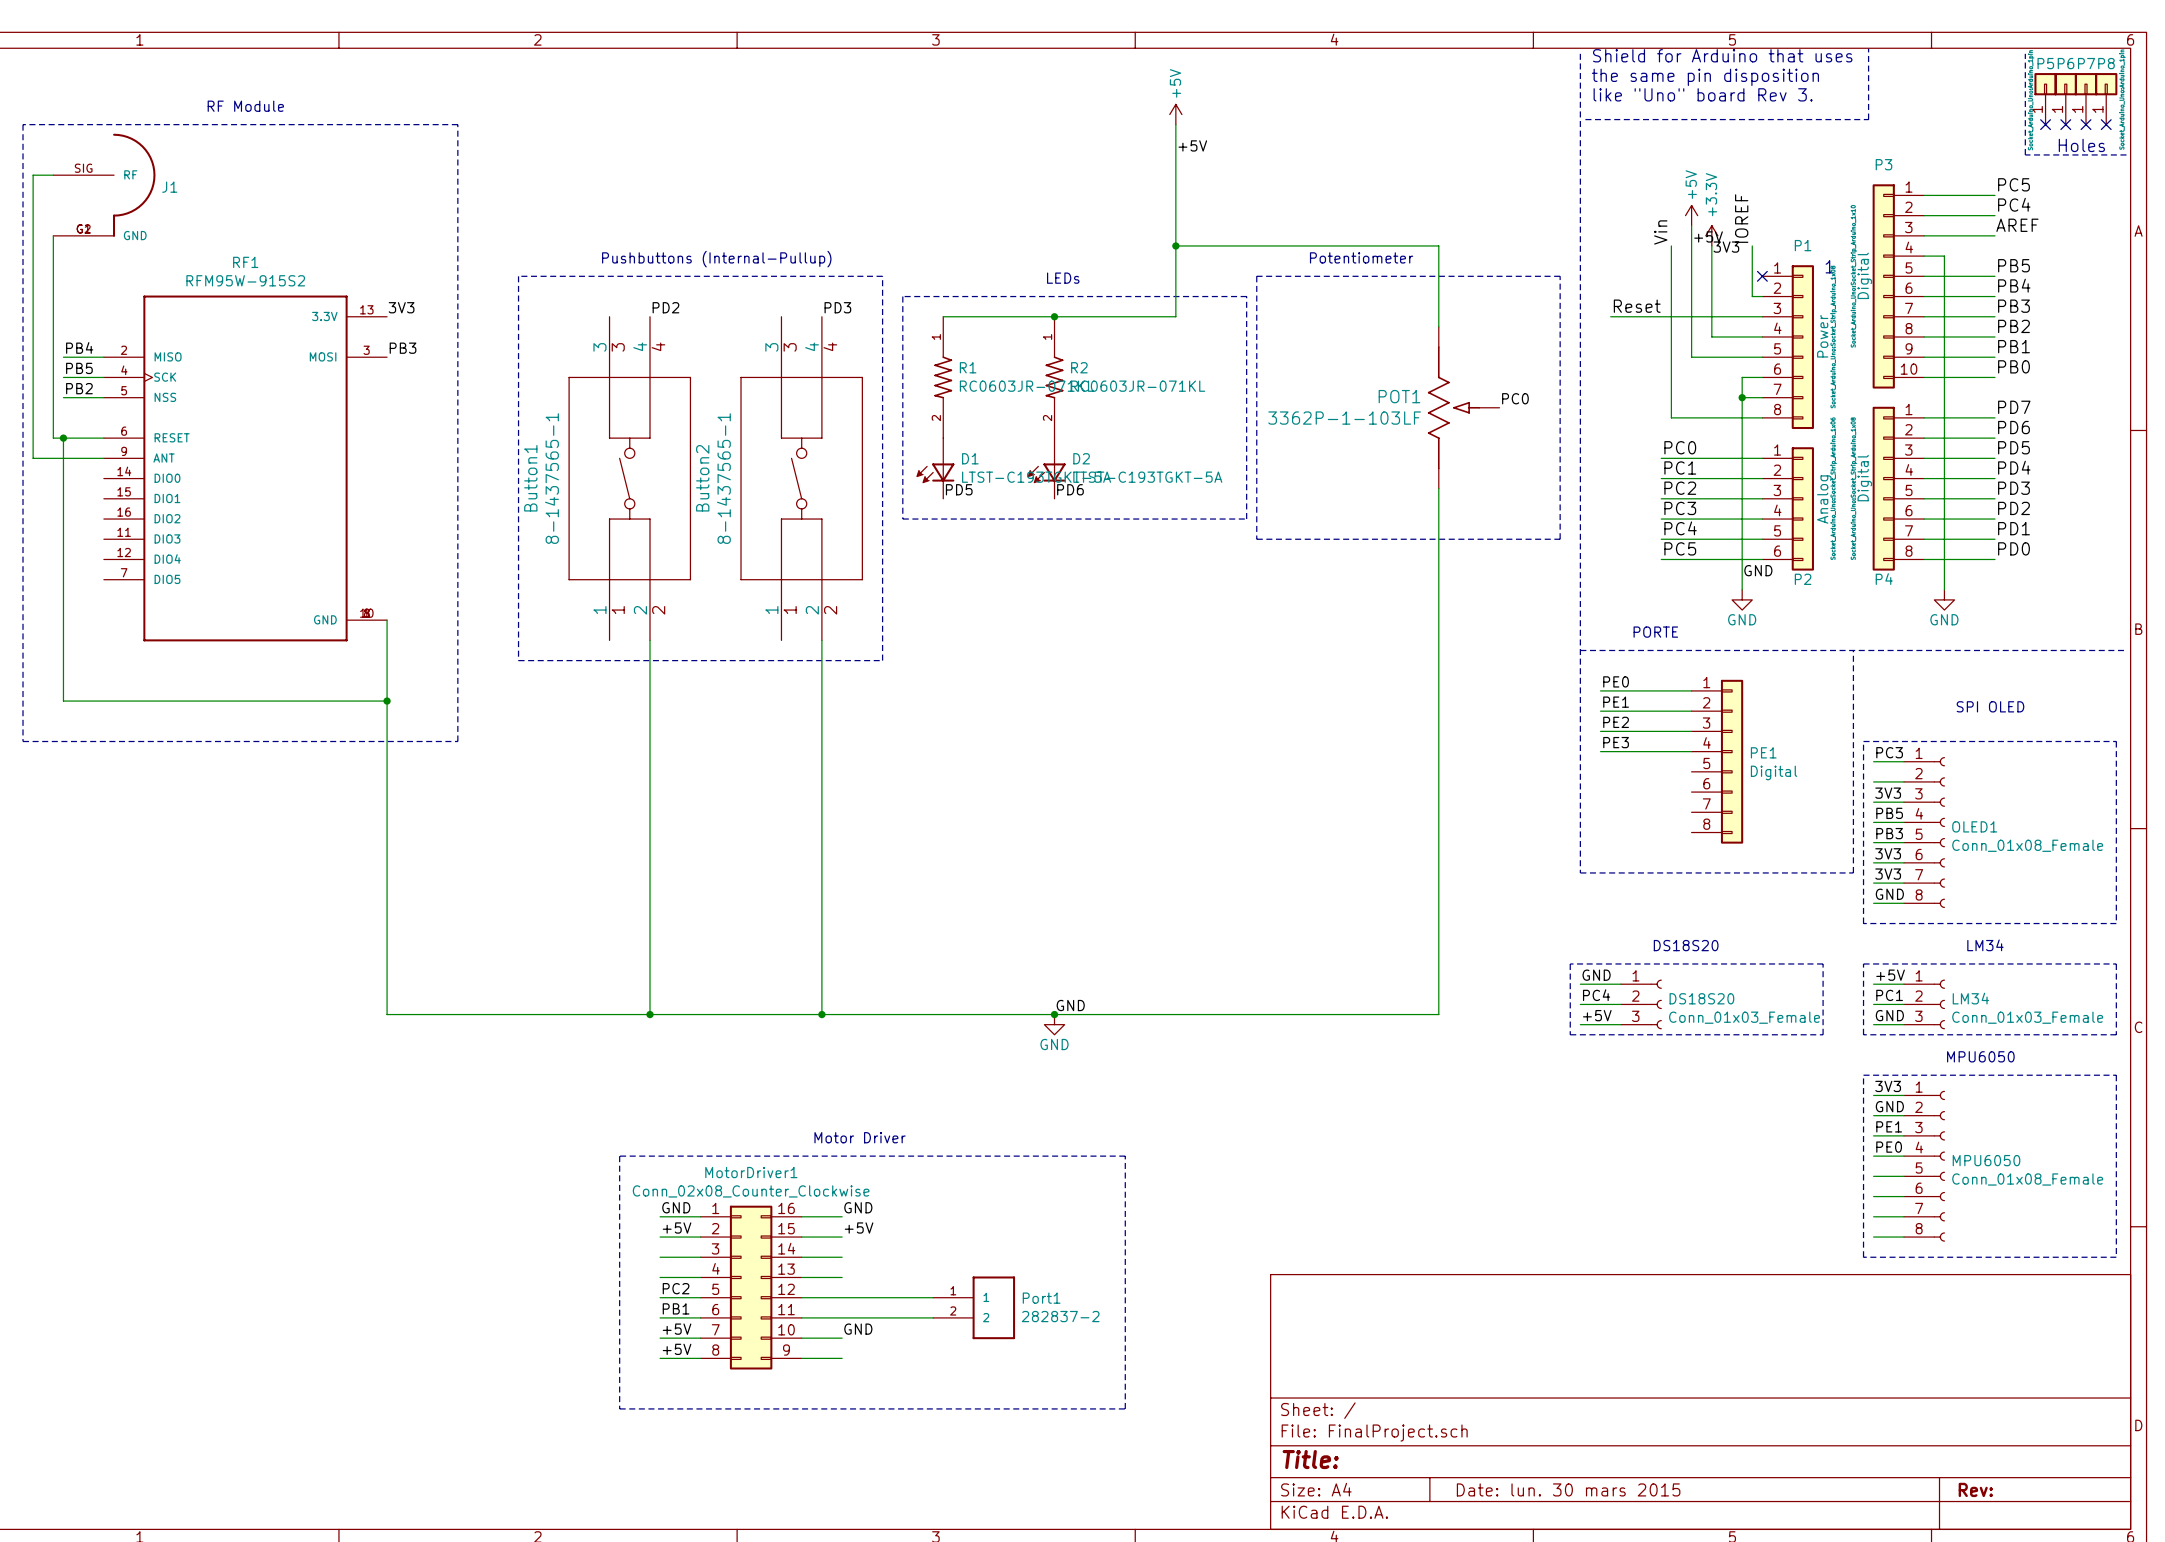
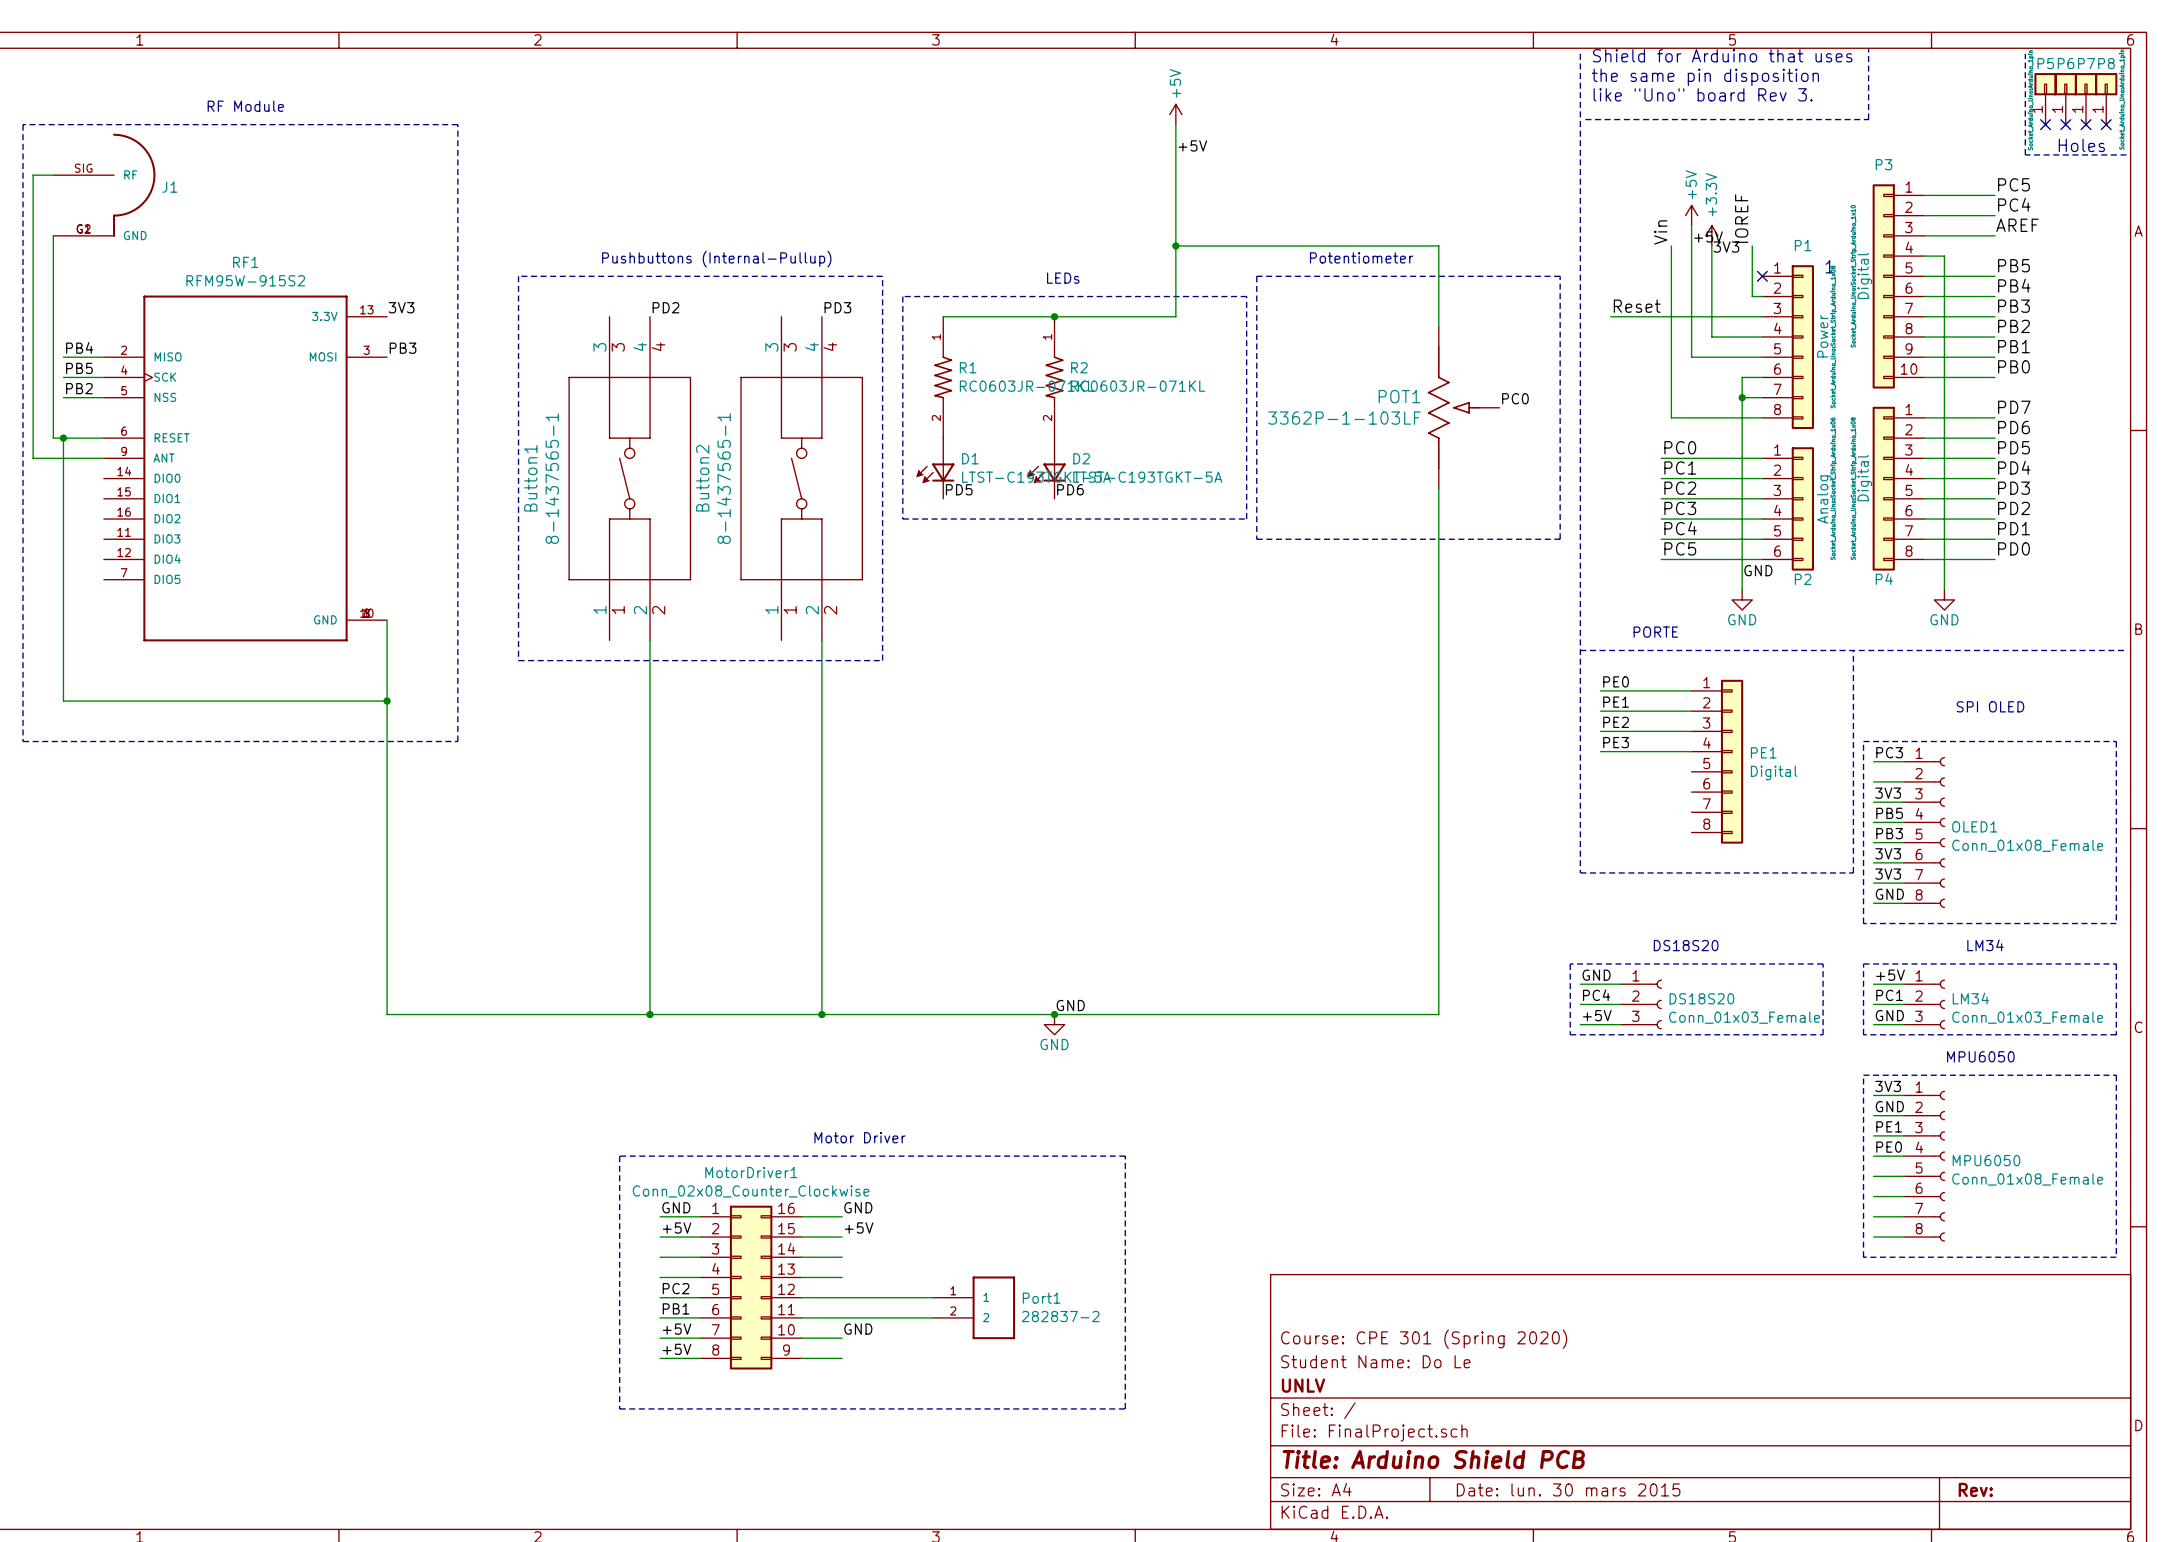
title block: none -> Course: CPE 301 (Spring 2020) (1424, 1339)
title block: none -> Student Name: Do Le (1375, 1361)
title block: none -> UNLV (1303, 1385)
title block: Title: (1310, 1459) -> Title: Arduino Shield PCB (1433, 1459)

